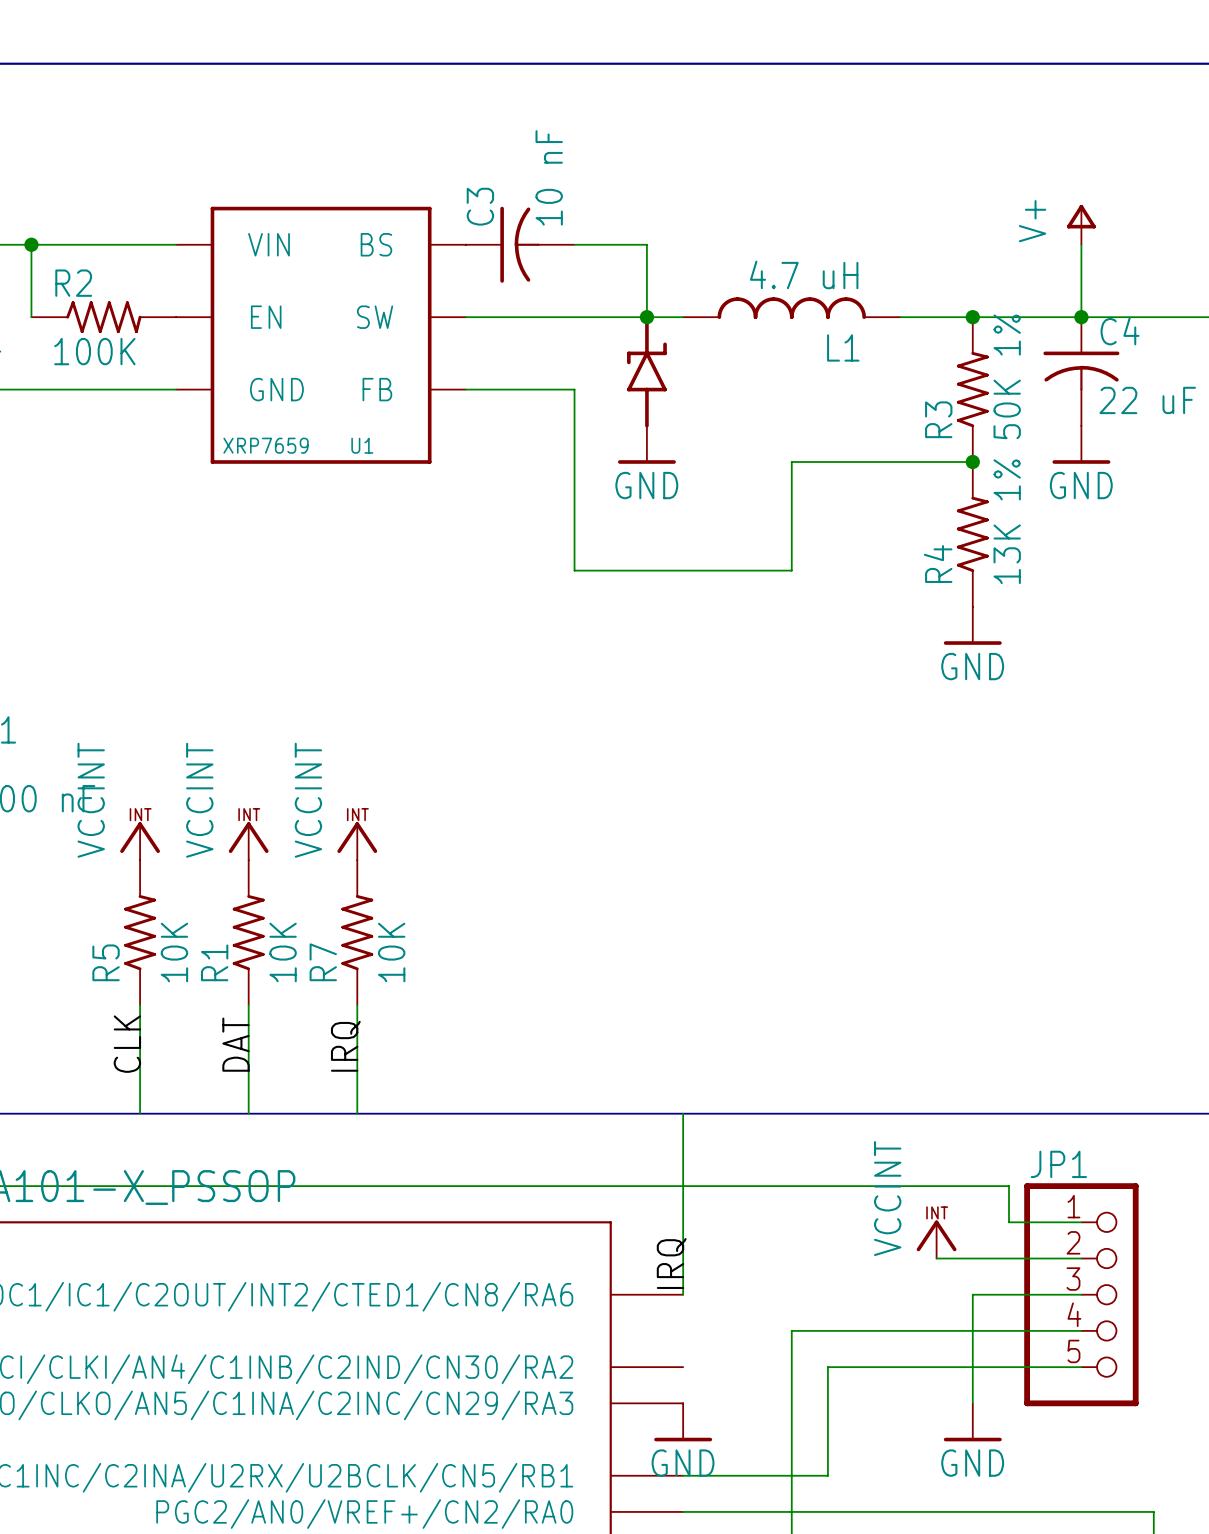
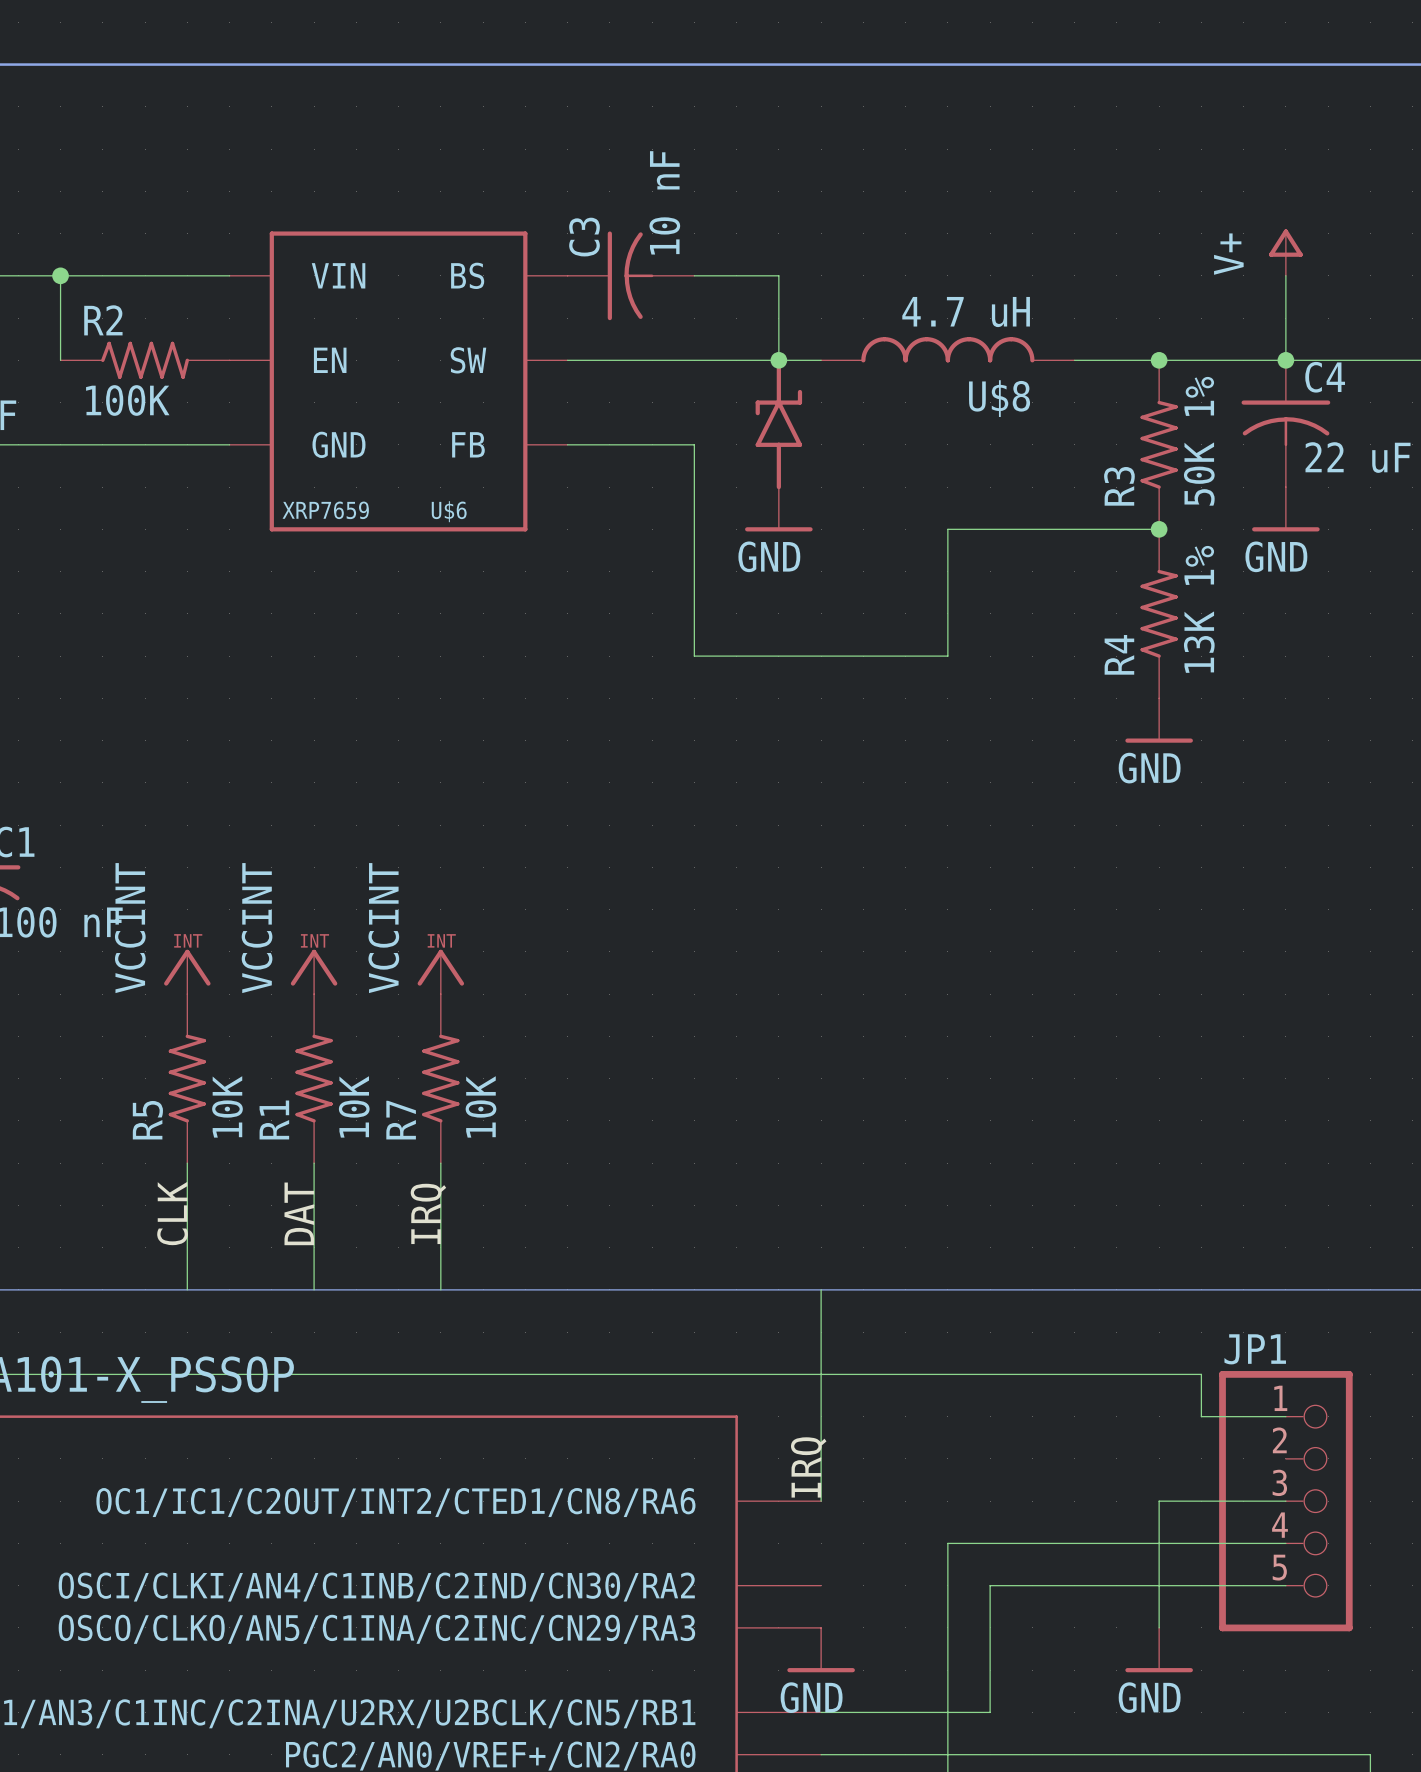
L1 name: L1 (843, 347) -> U$8 (999, 398)
U1 name: U1 (362, 445) -> U$6 (449, 511)
power symbol: VCCINT (936, 1239) -> none
wire: (936, 1258) (1081, 1258) -> none

